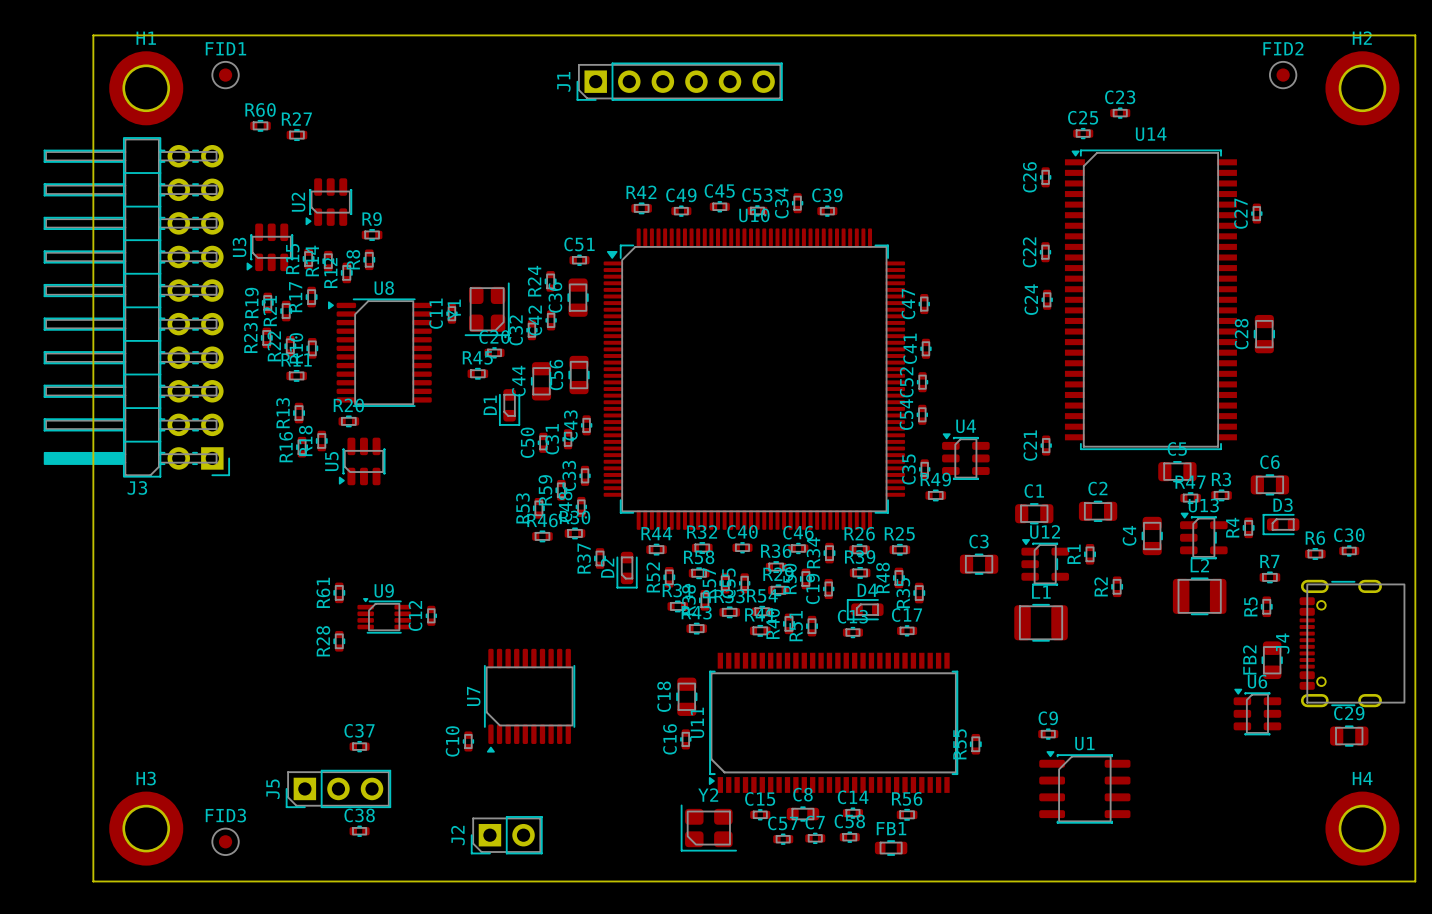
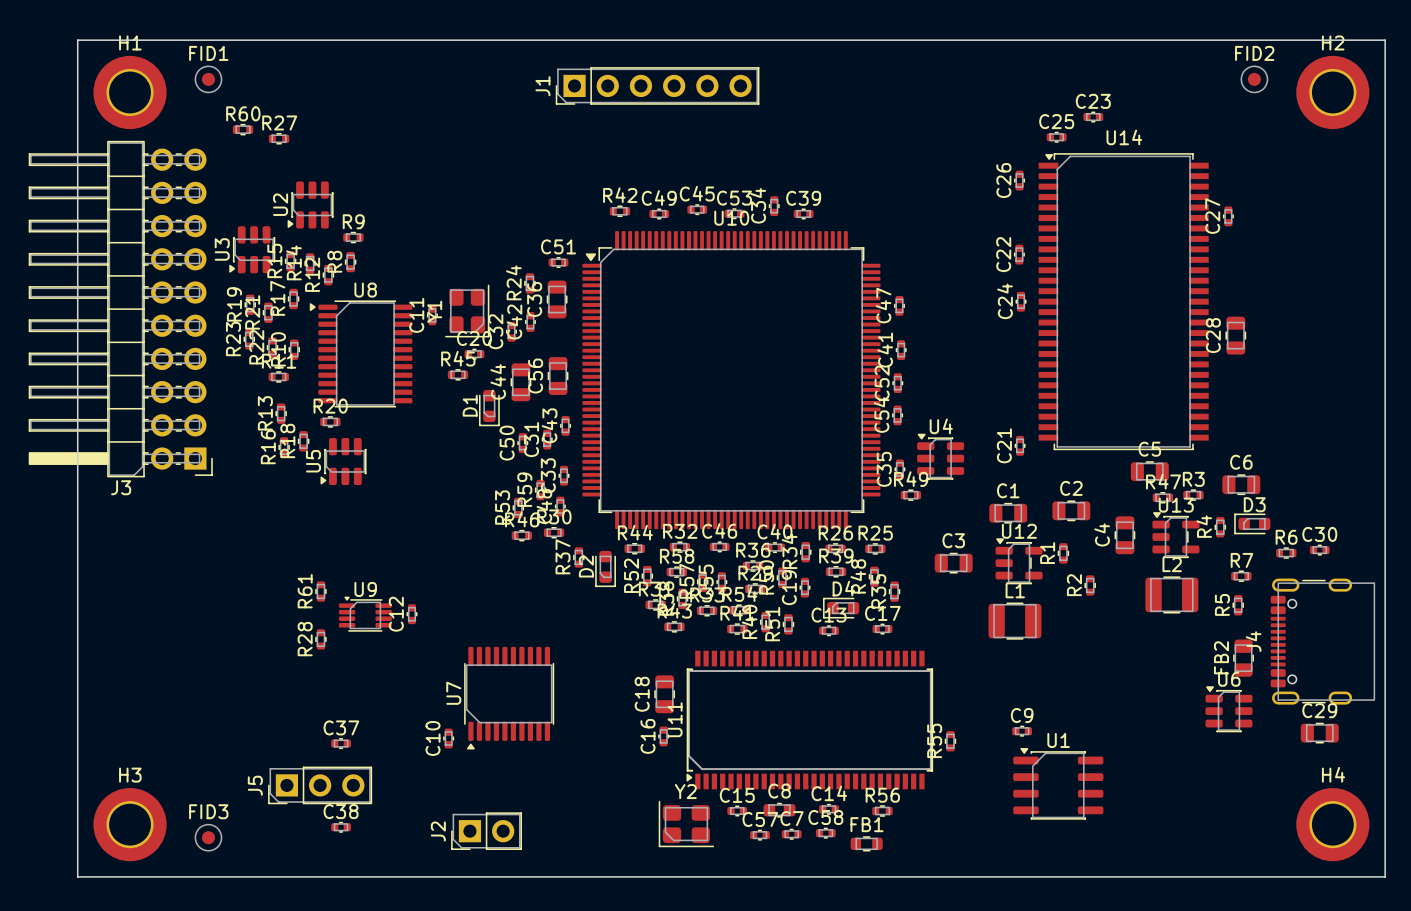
C40 name: C40 (742, 531) -> C46 (719, 530)
C46 name: C46 (798, 532) -> C40 (774, 531)

